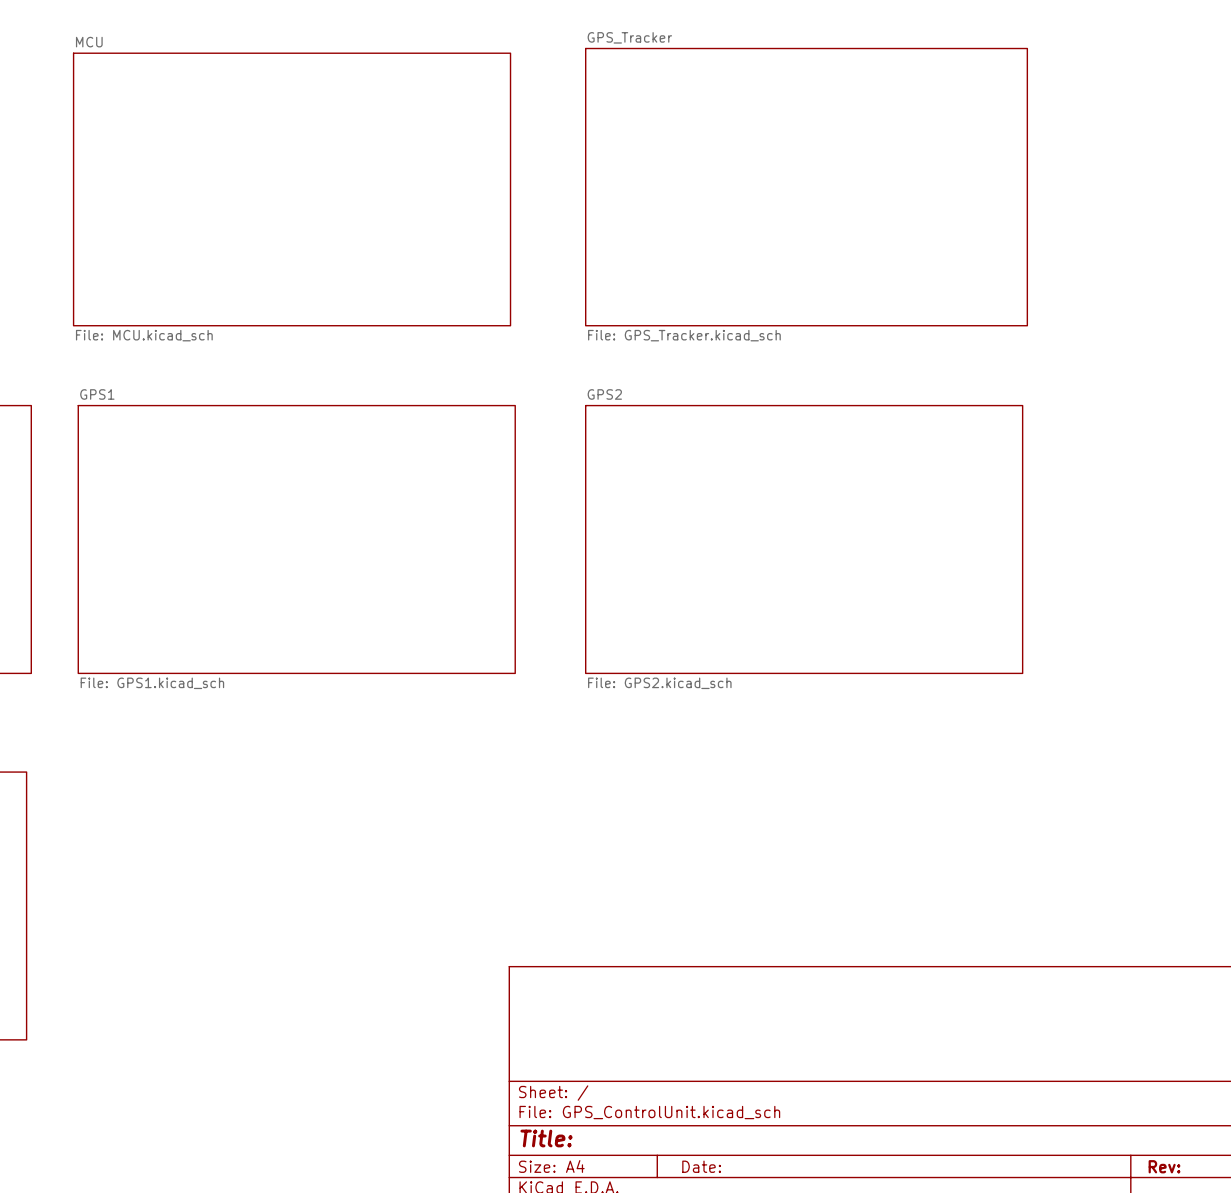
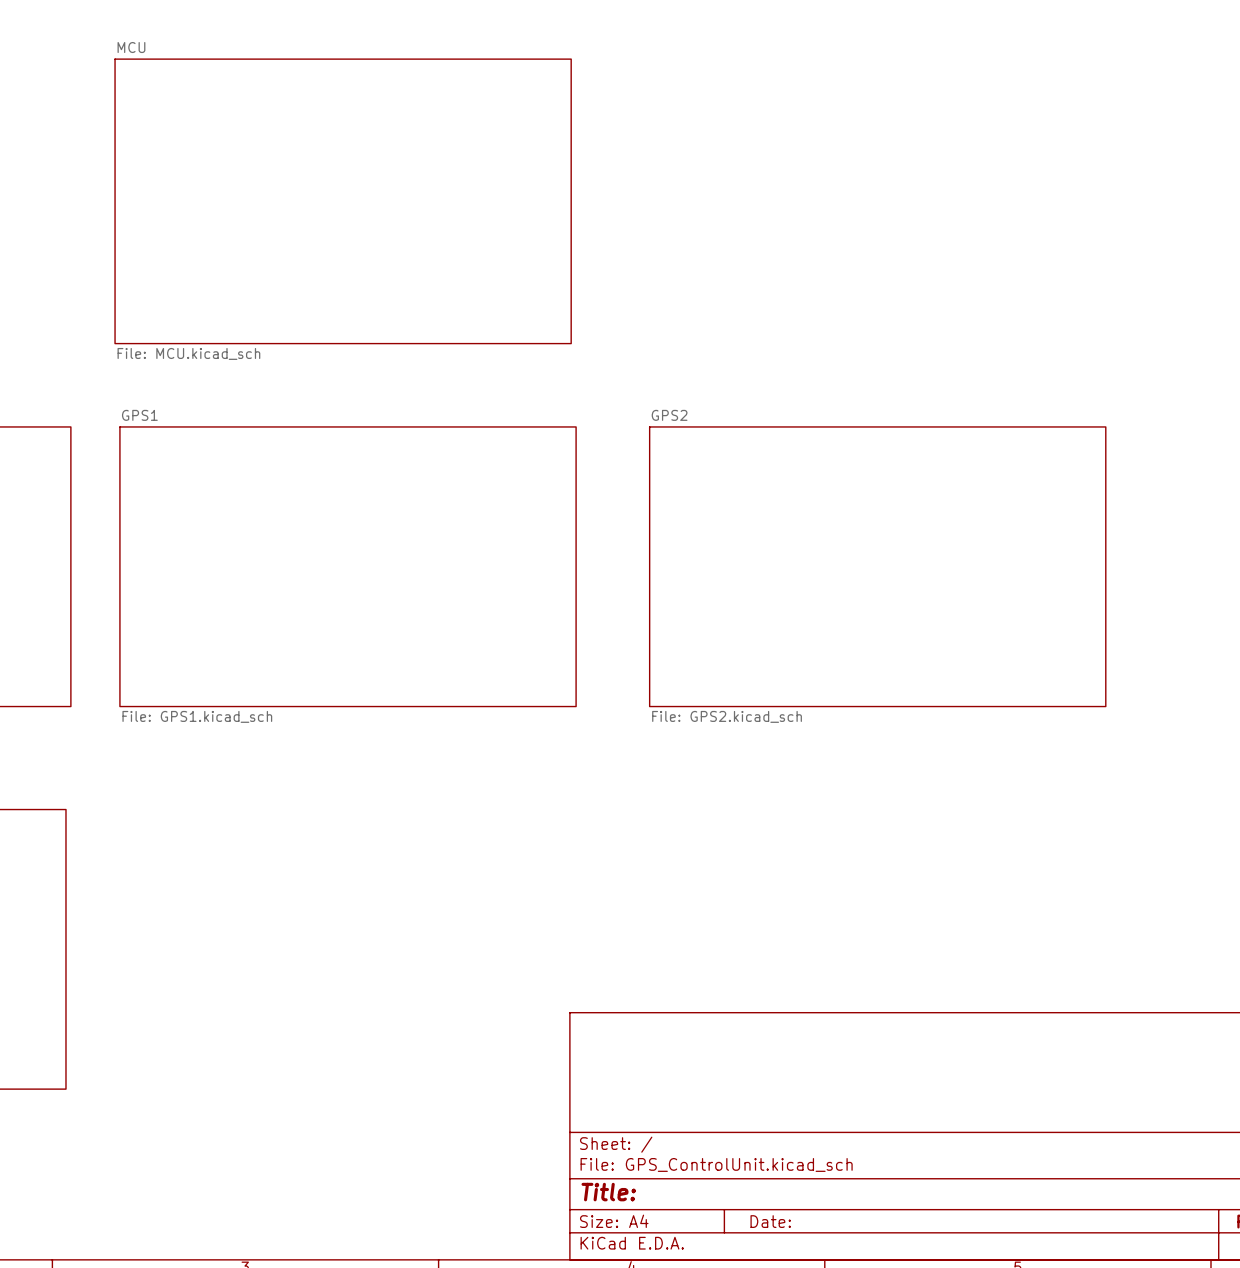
sheet GPS_Tracker: File: GPS_Tracker.kicad_sch (806, 187) -> none

